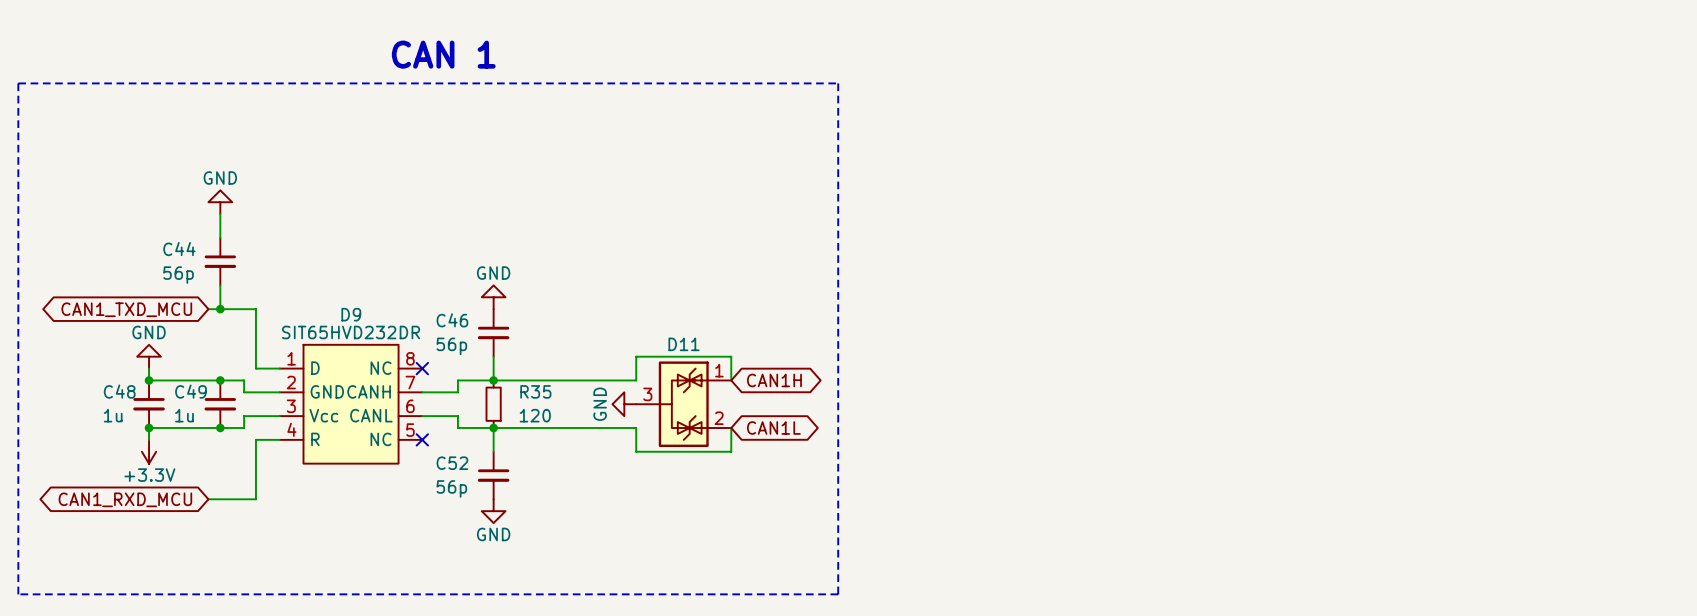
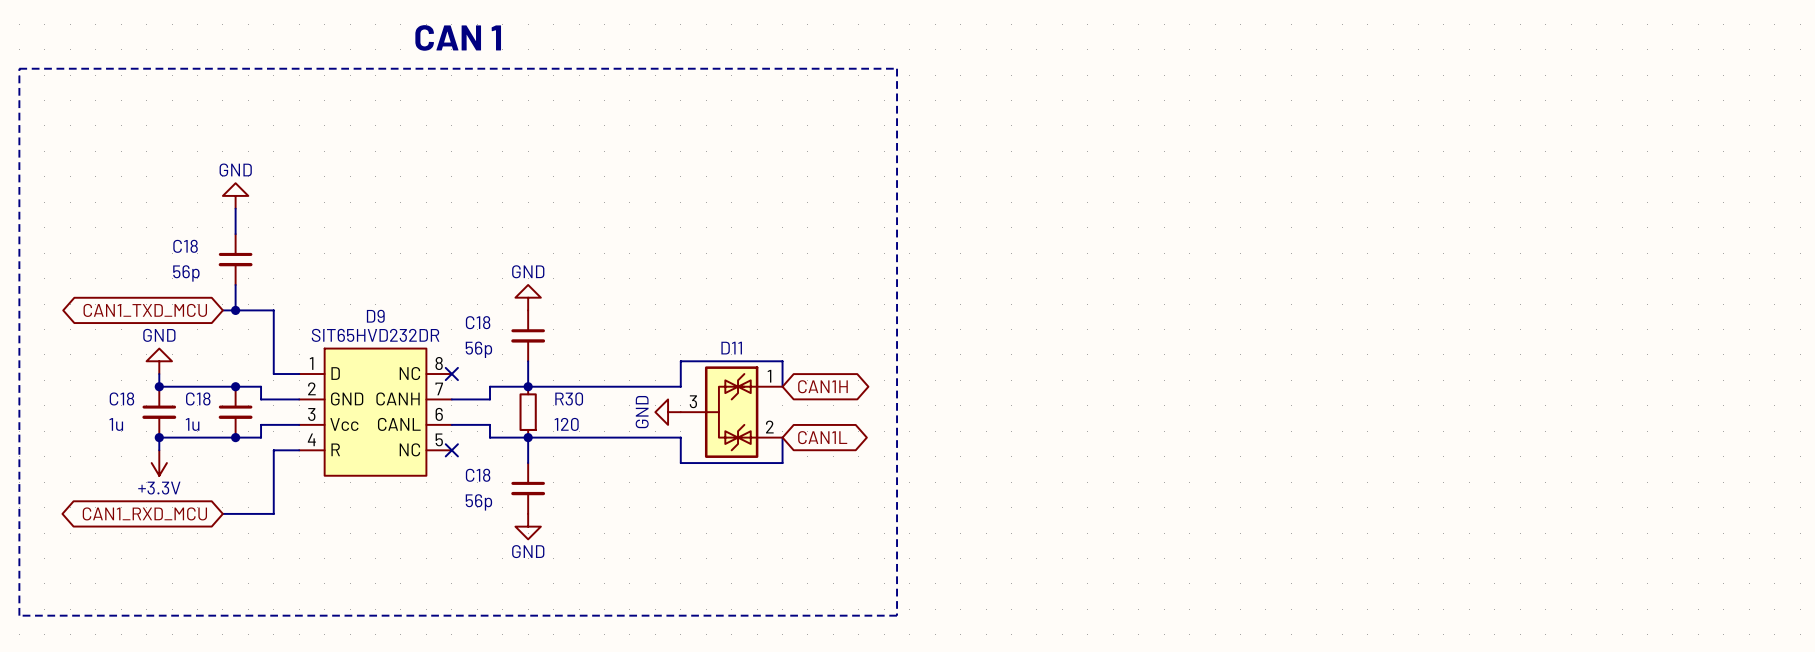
C44 name: C44 (179, 249) -> C18 (185, 246)
C46 name: C46 (452, 320) -> C18 (478, 322)
C48 name: C48 (119, 391) -> C18 (121, 398)
C49 name: C49 (190, 391) -> C18 (198, 398)
R35 name: R35 (535, 391) -> R30 (569, 398)
C52 name: C52 (452, 463) -> C18 (478, 475)

